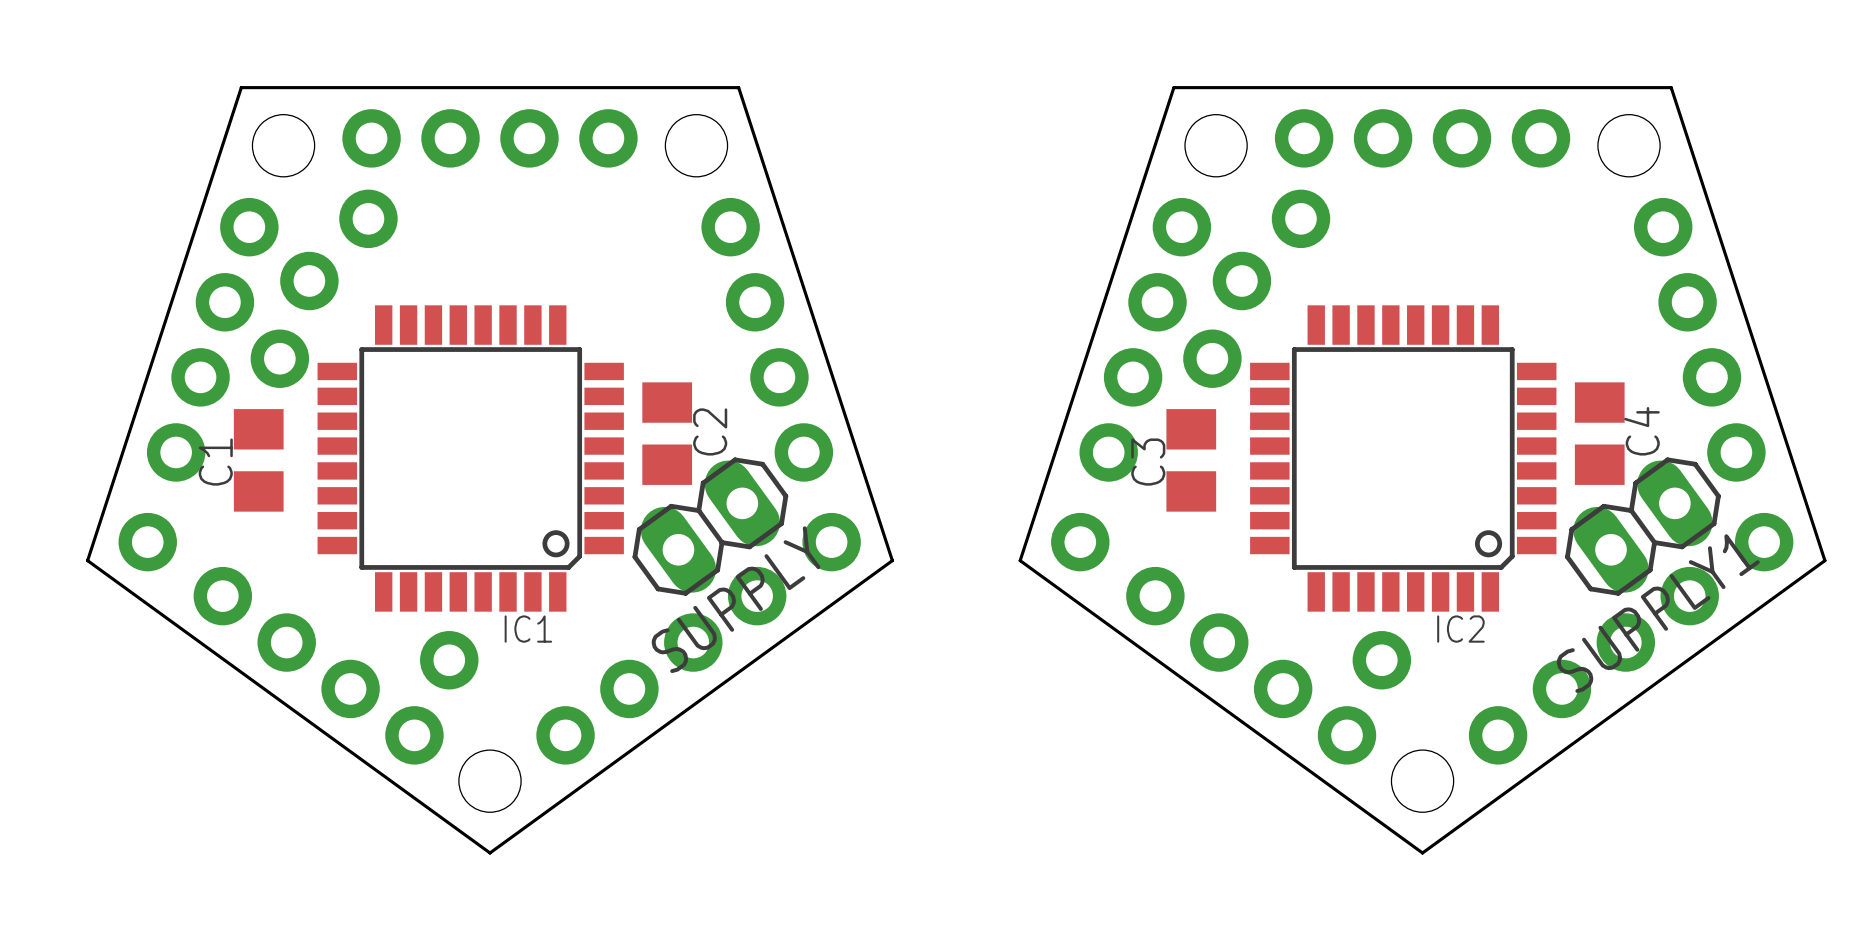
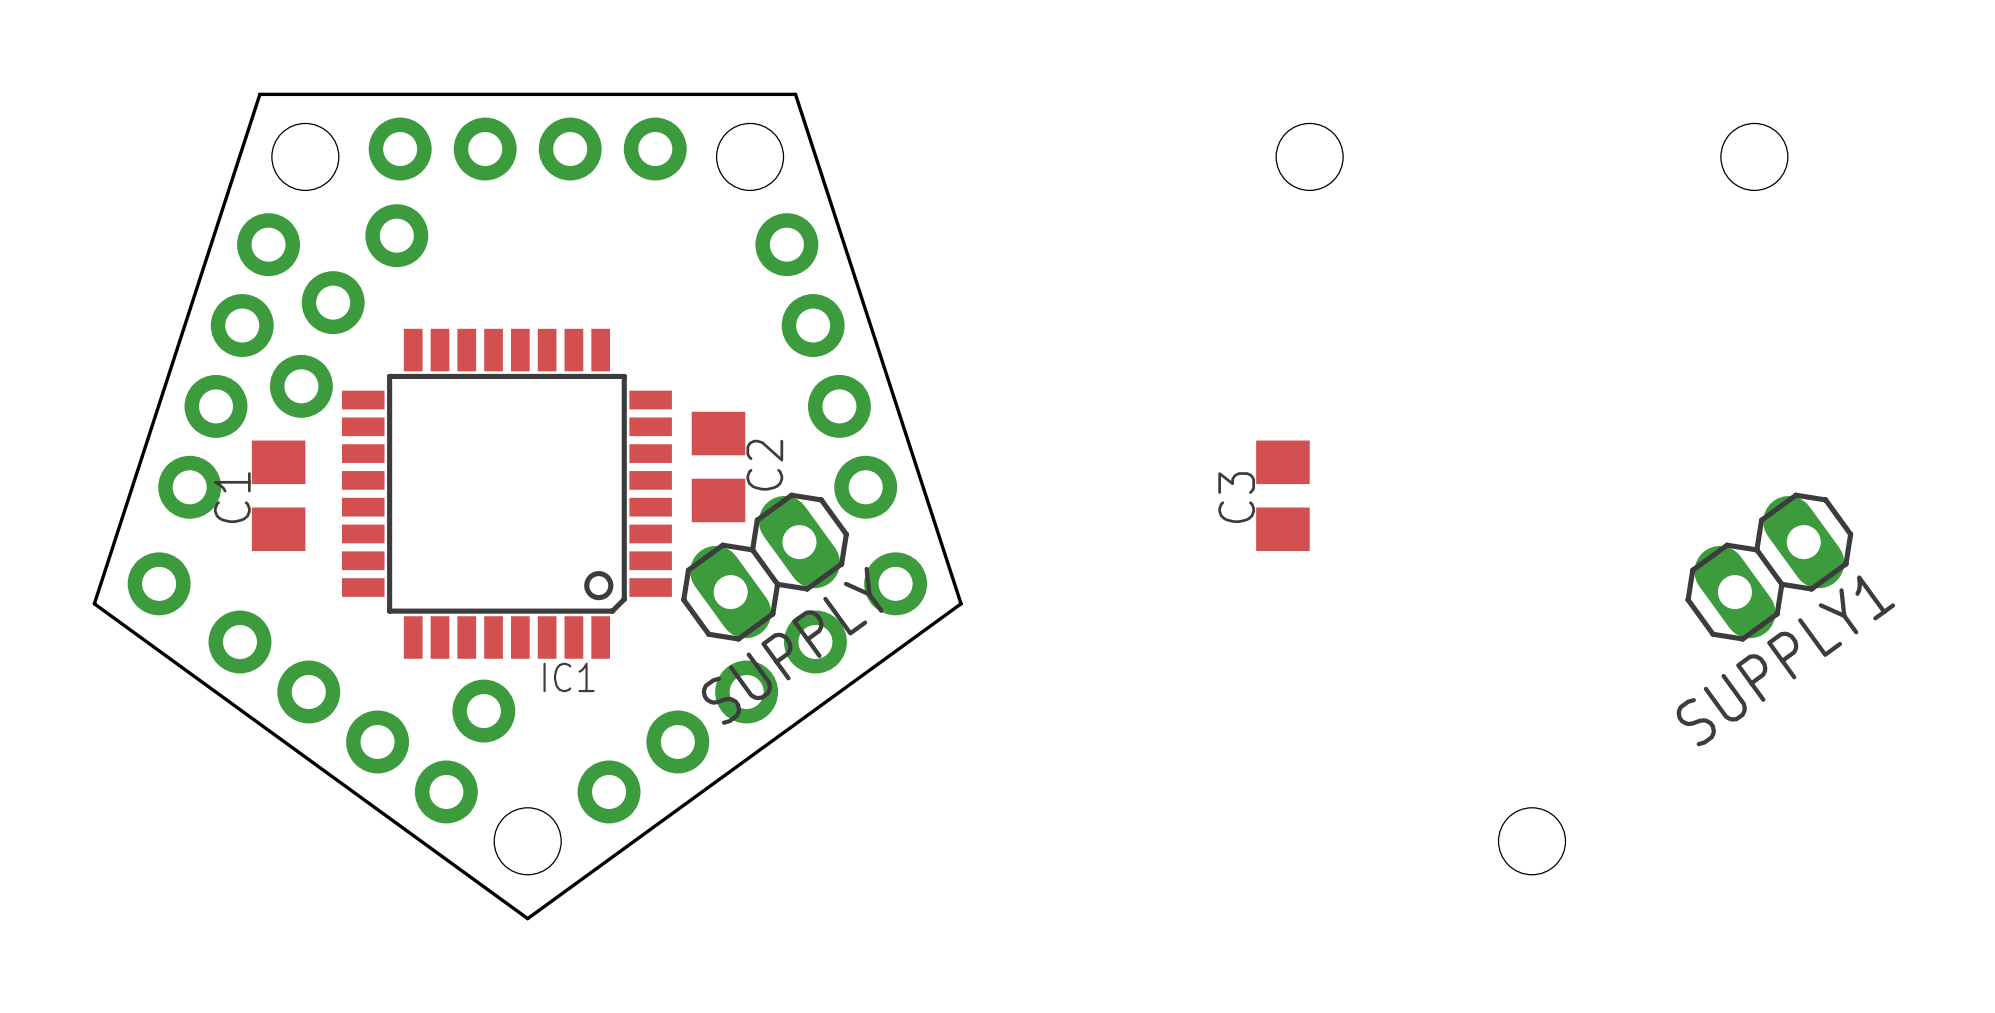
board edge: (1173, 87) (1671, 87) (1824, 560) (1422, 852) (1020, 560) (1173, 87) -> none
part: (1422, 138) -> none
part: (1301, 218) -> none
part: (1241, 281) -> none
part: (1145, 339) -> none
part: (1699, 339) -> none
part: (1212, 358) -> none
C4: (1599, 433) -> none
IC2: (1403, 458) -> none
part: (1080, 542) -> none
part: (1764, 542) -> none
part: (1381, 660) -> none
part: (1251, 665) -> none
part: (1593, 665) -> none

